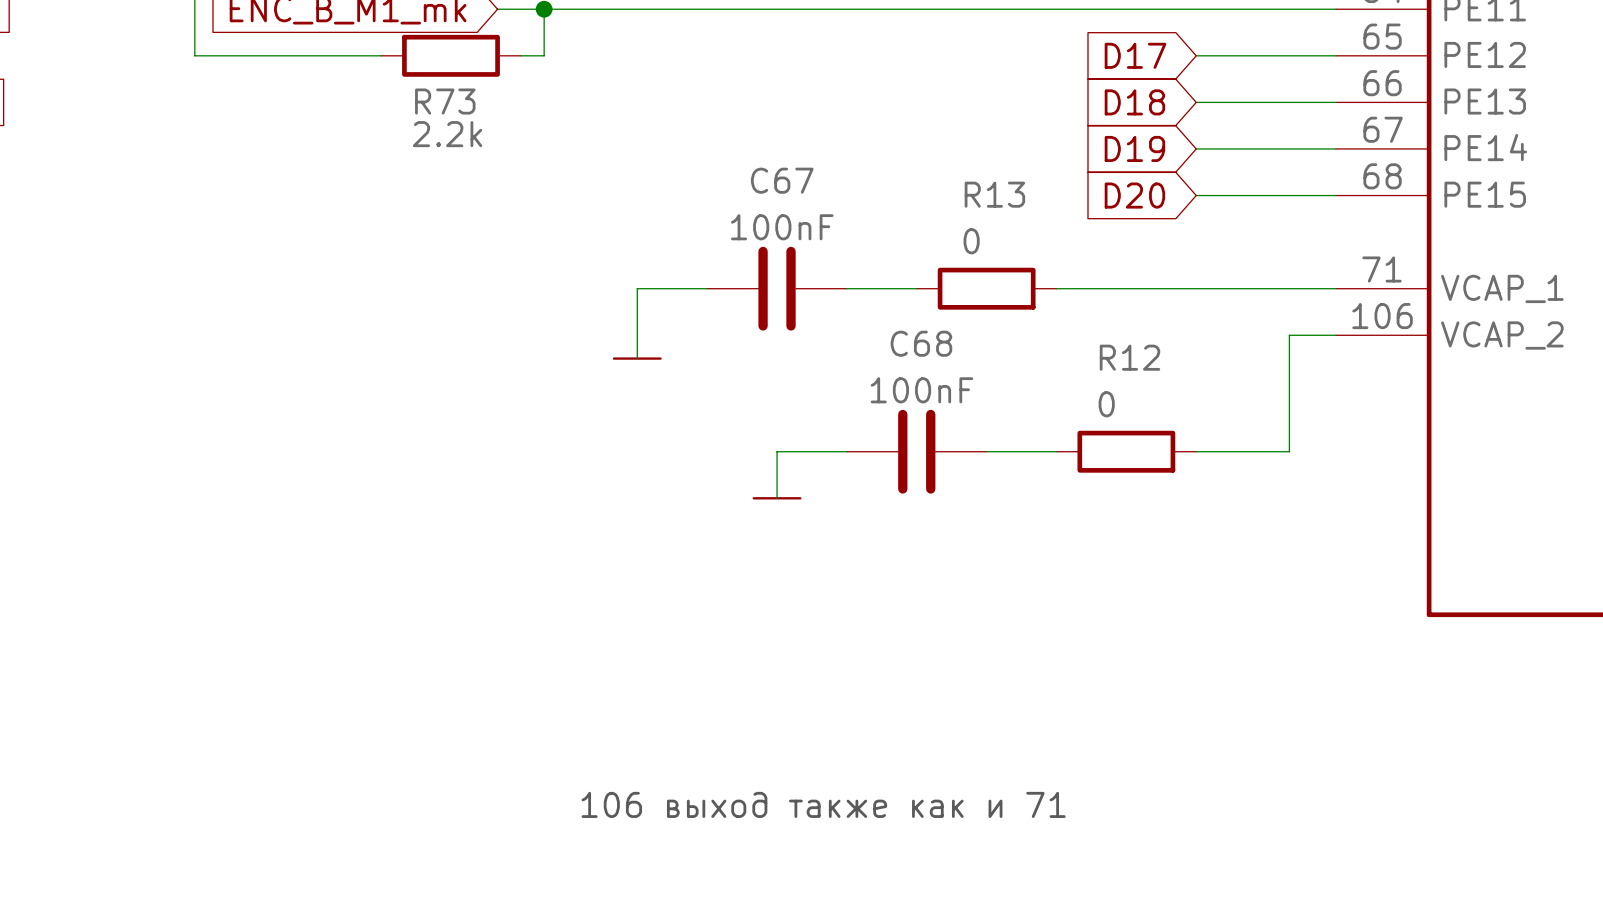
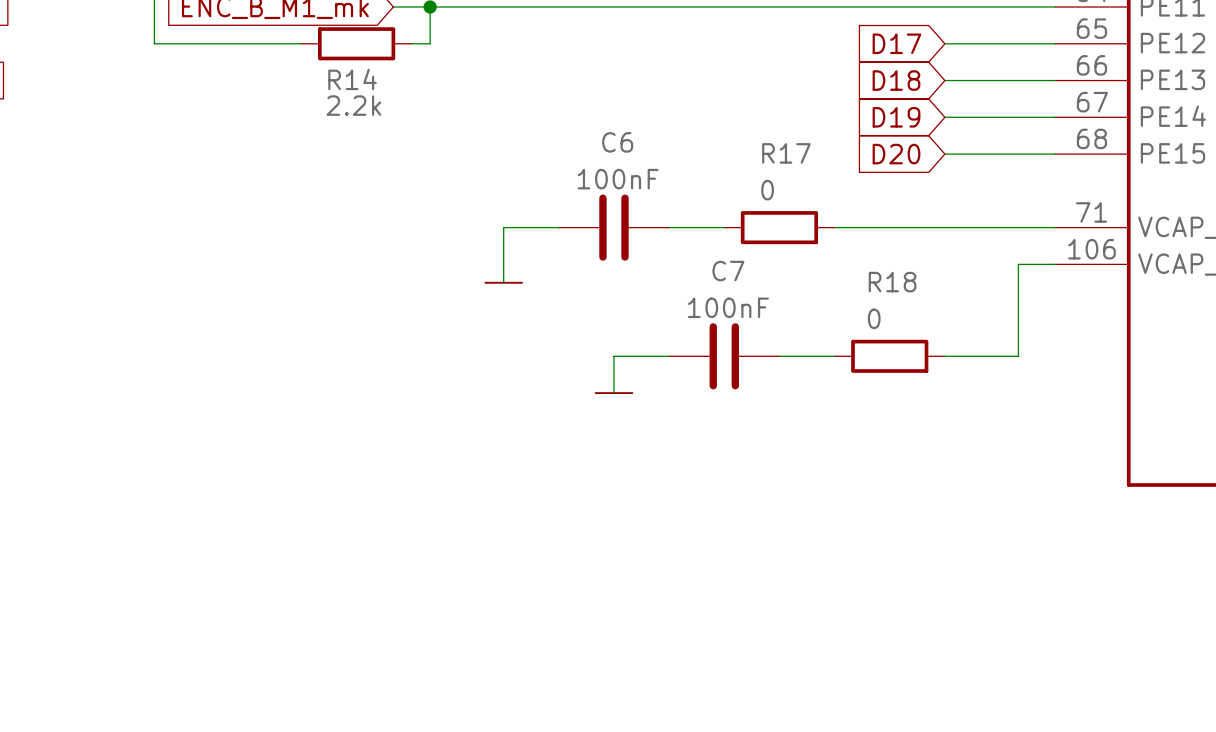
R73 name: R73 (445, 101) -> R14 (352, 79)
C67 name: C67 (782, 180) -> C6 (617, 142)
R13 name: R13 (994, 194) -> R17 (786, 153)
C68 name: C68 (921, 343) -> C7 (728, 271)
R12 name: R12 (1129, 357) -> R18 (892, 282)
text: 106 выход также как и 71 (823, 804) -> none

